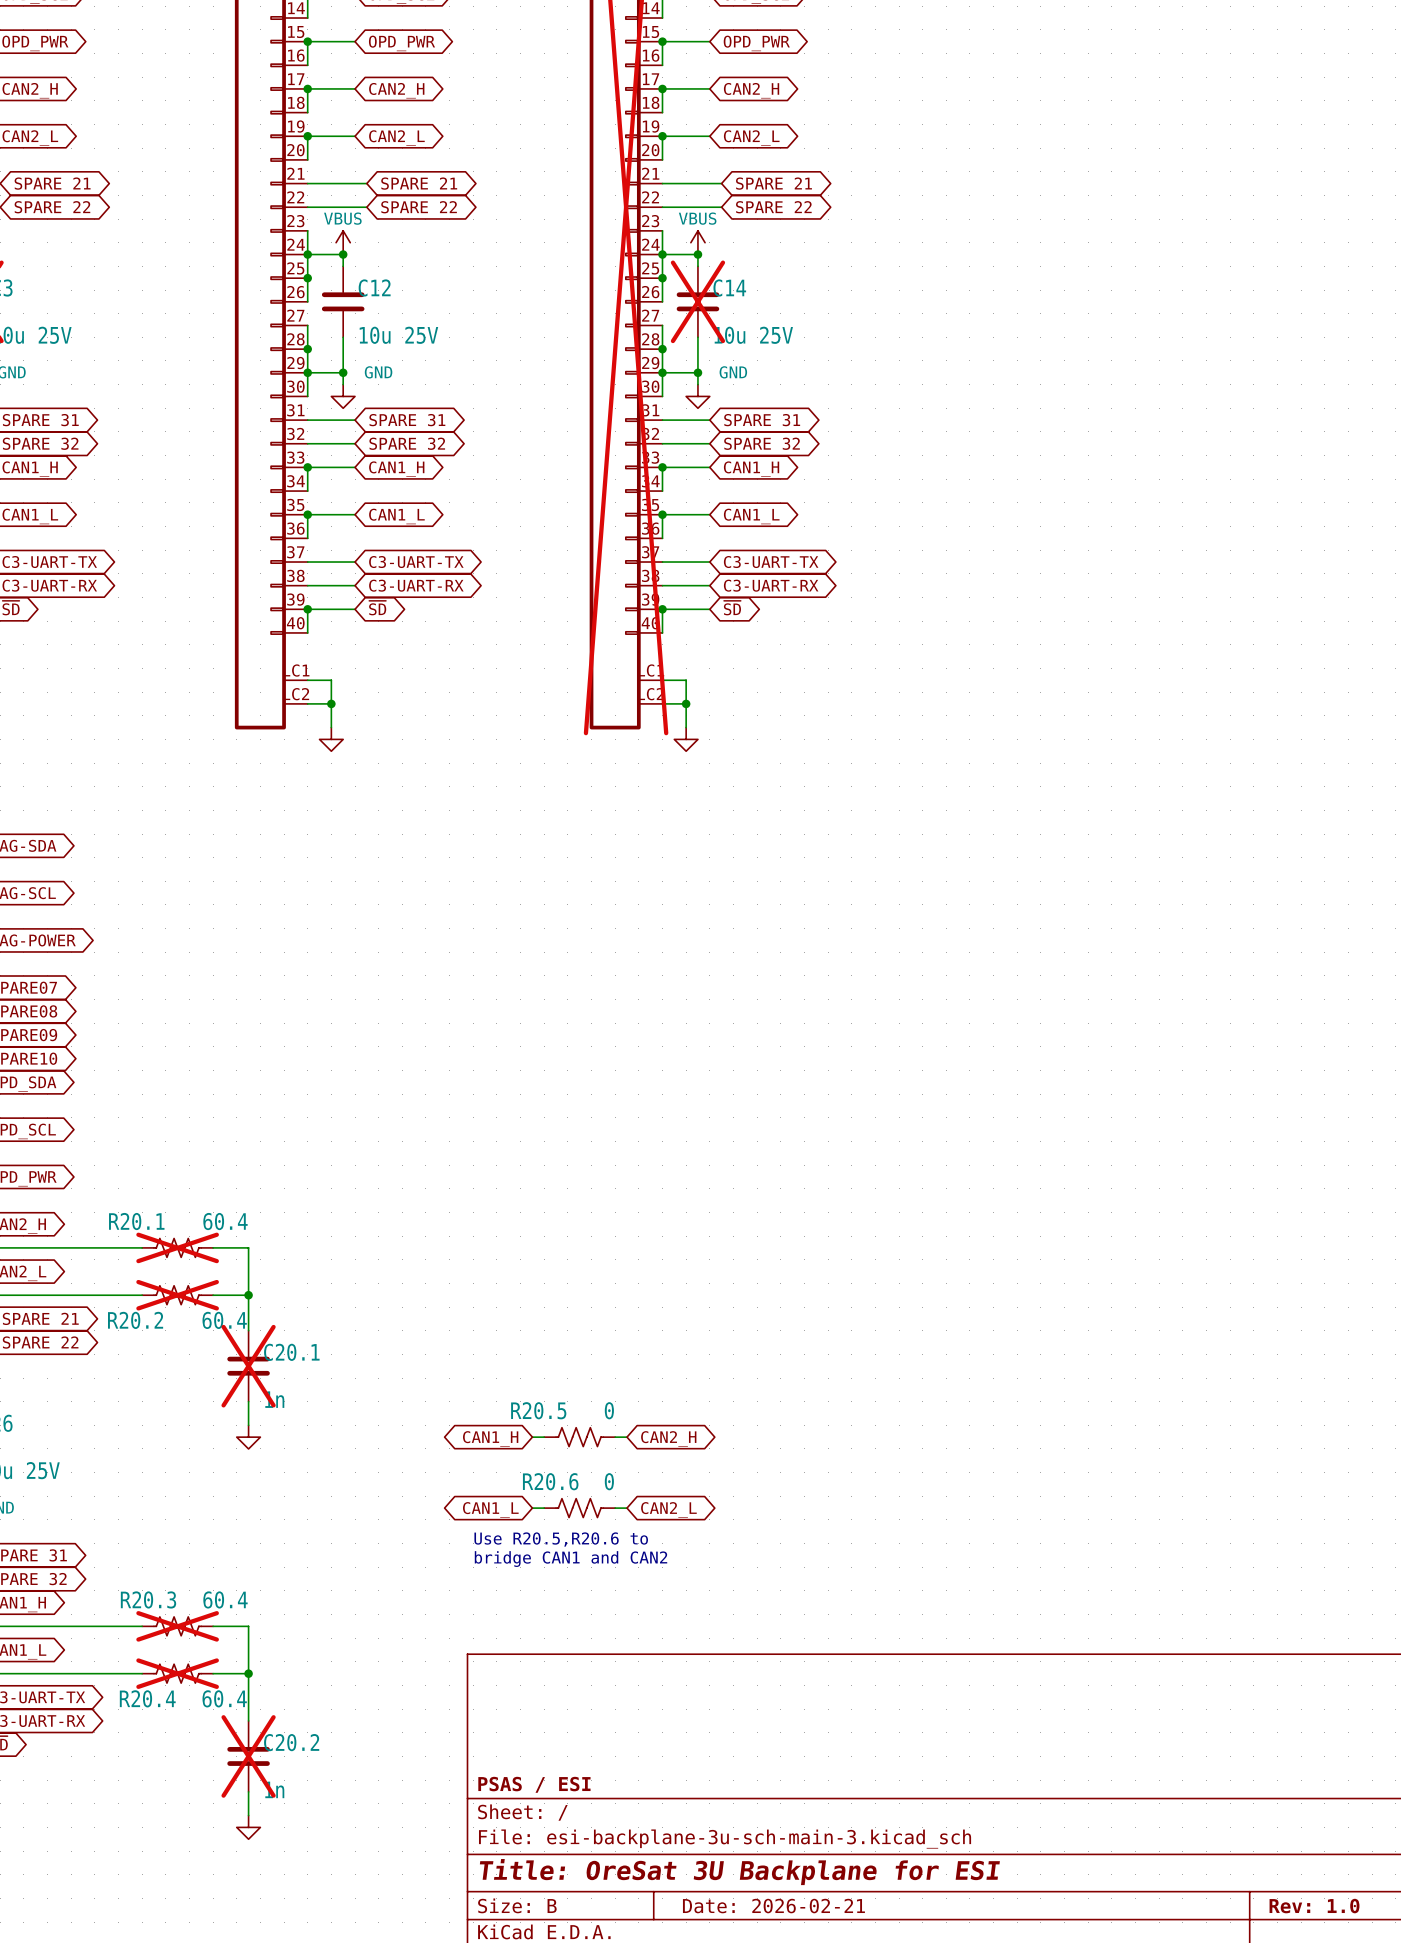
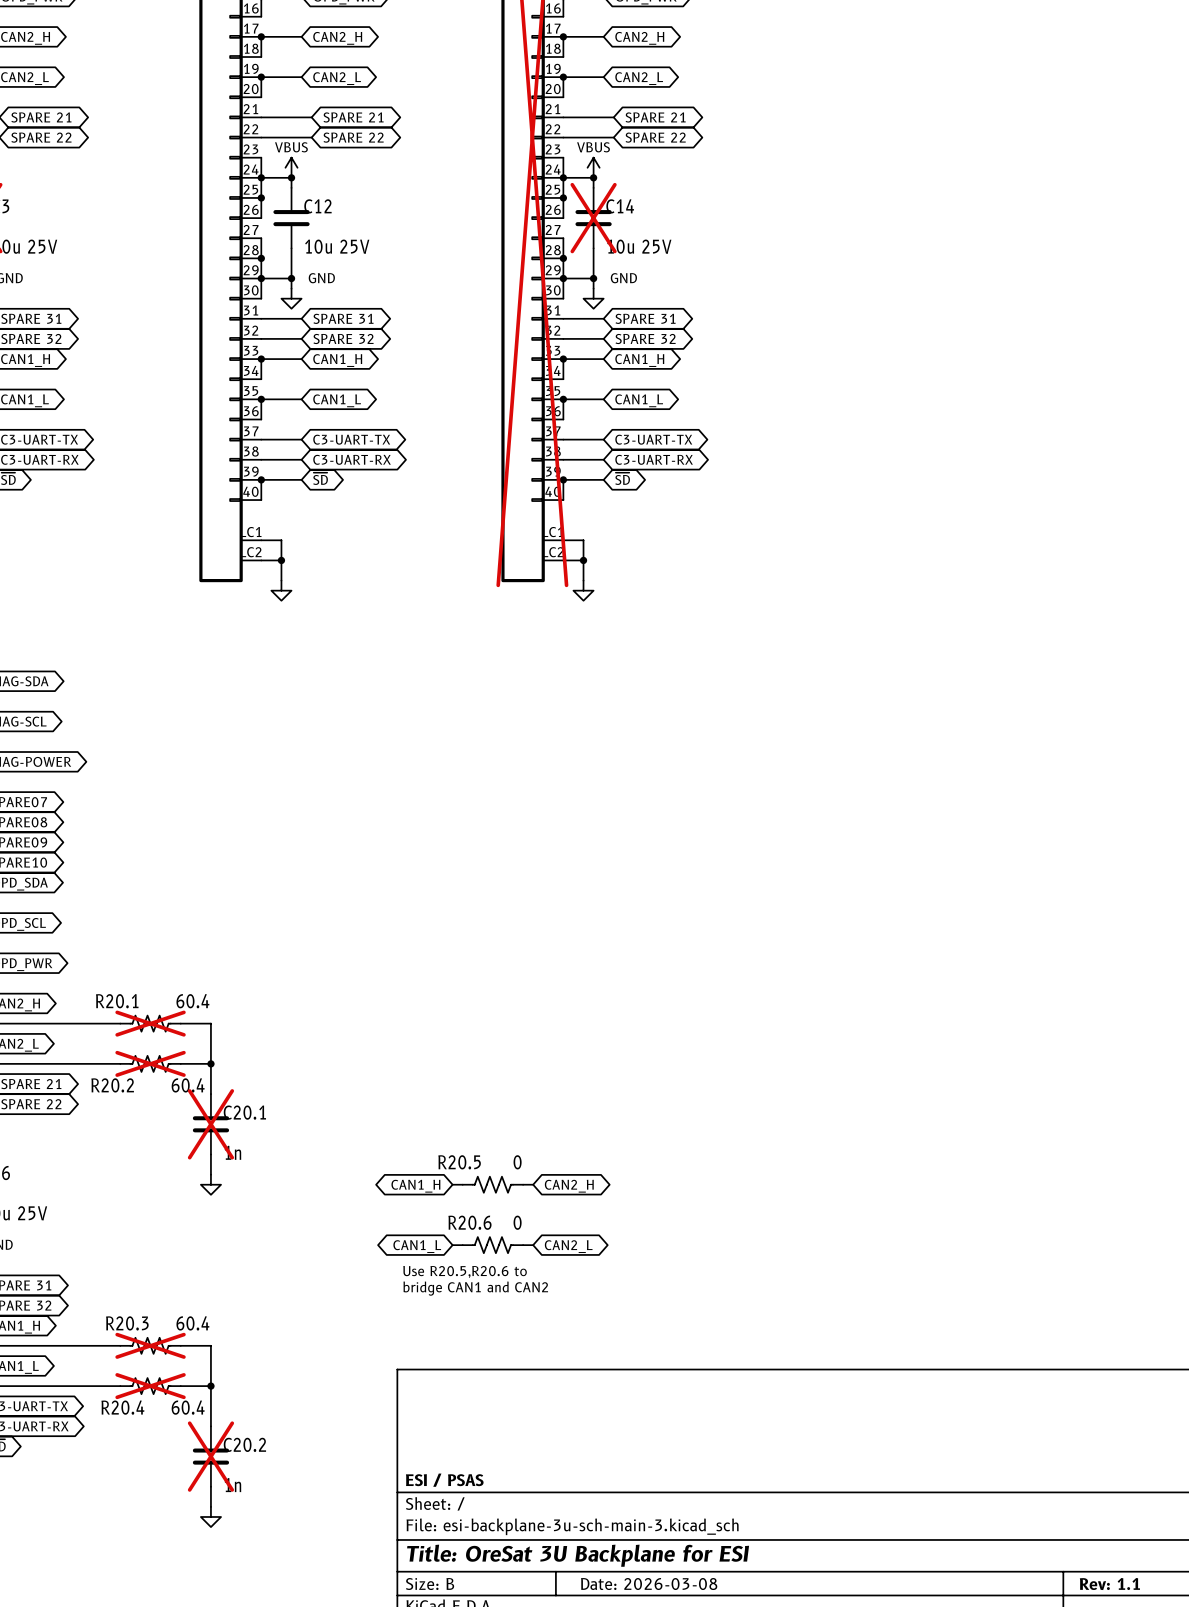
title block: PSAS / ESI (534, 1784) -> ESI / PSAS (444, 1480)
title block: Date: 2026-02-21 (773, 1906) -> Date: 2026-03-08 (649, 1584)
title block: Rev: 1.0 (1314, 1906) -> Rev: 1.1 (1109, 1584)

